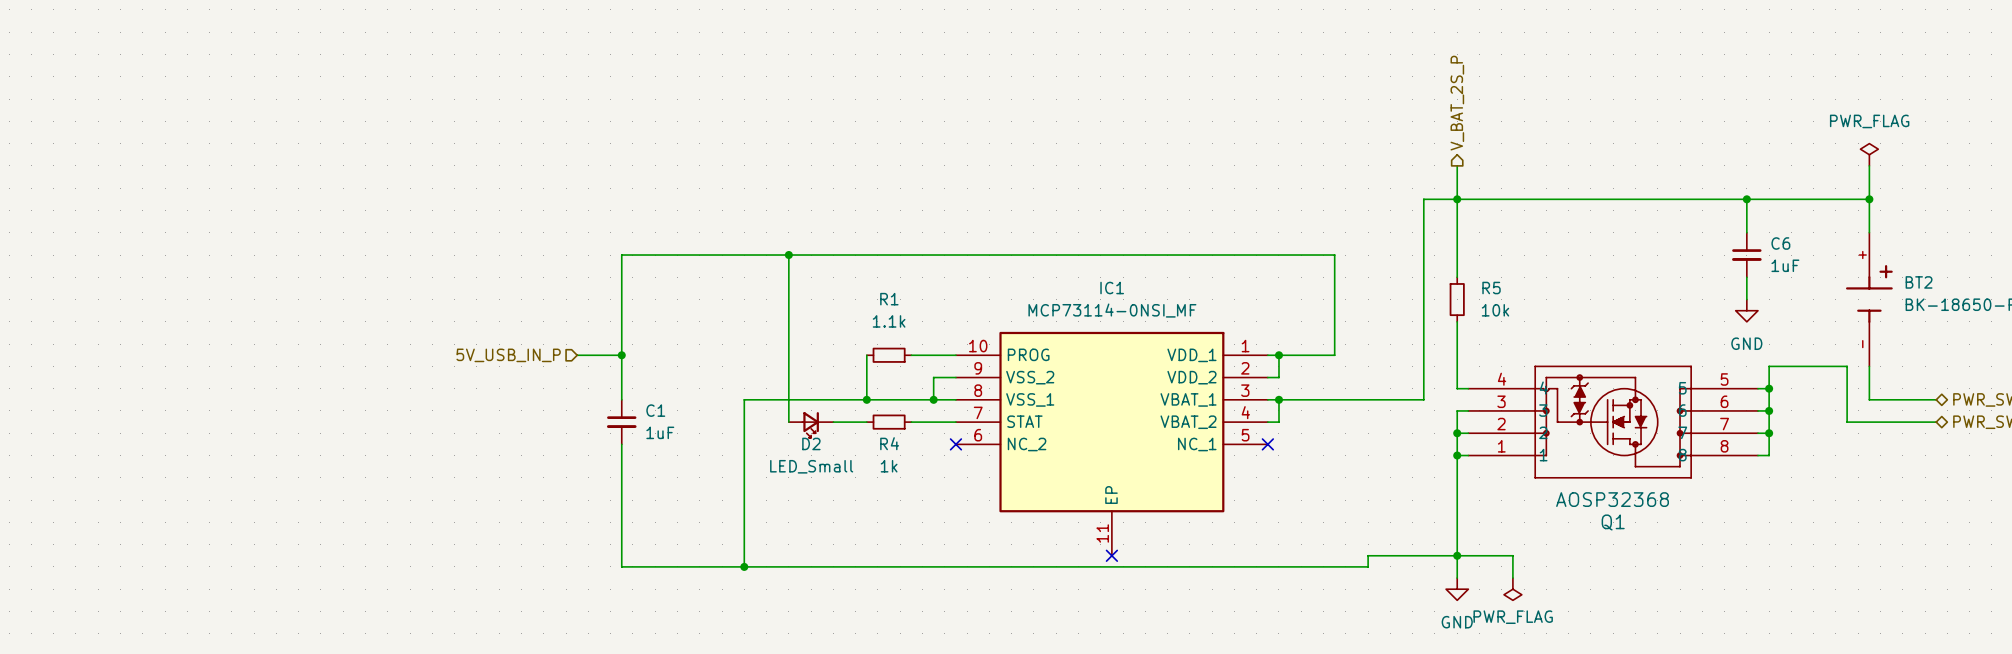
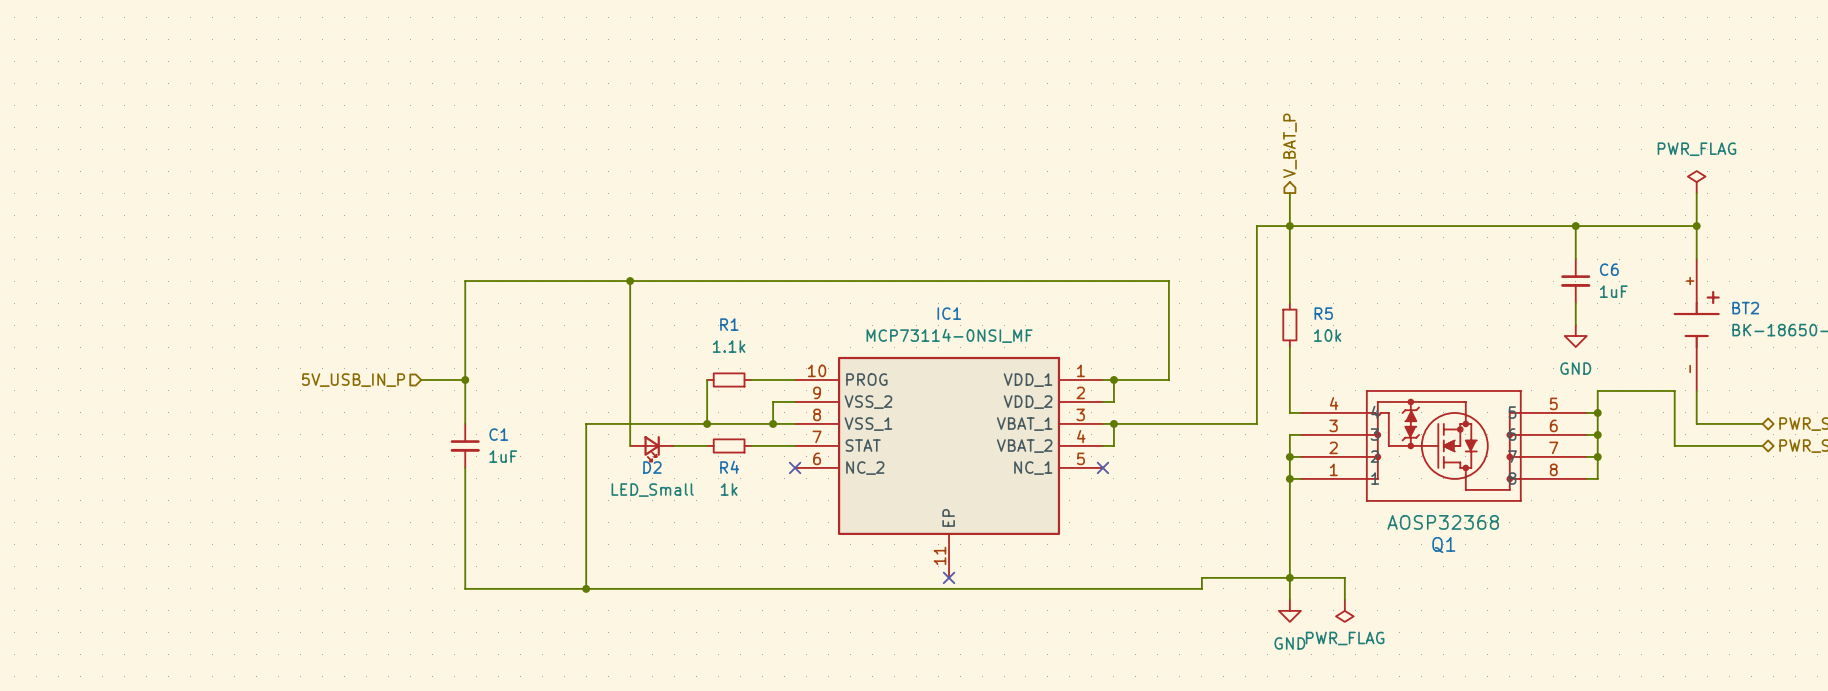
hierarchical label: V_BAT_2S_P (1457, 103) -> V_BAT_P (1289, 145)

